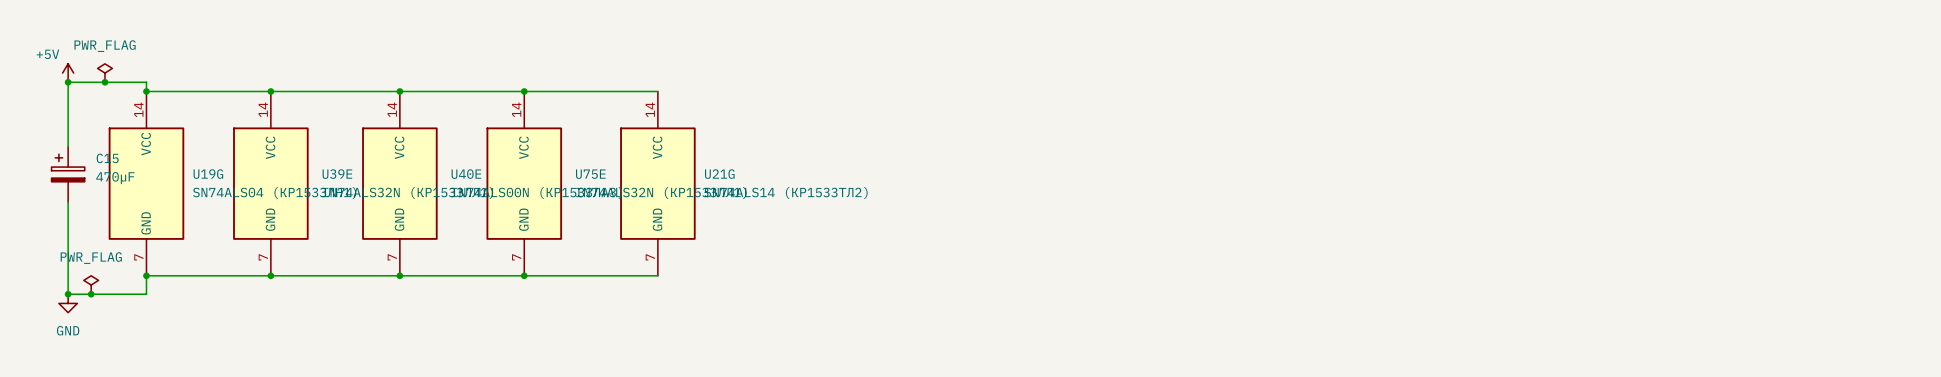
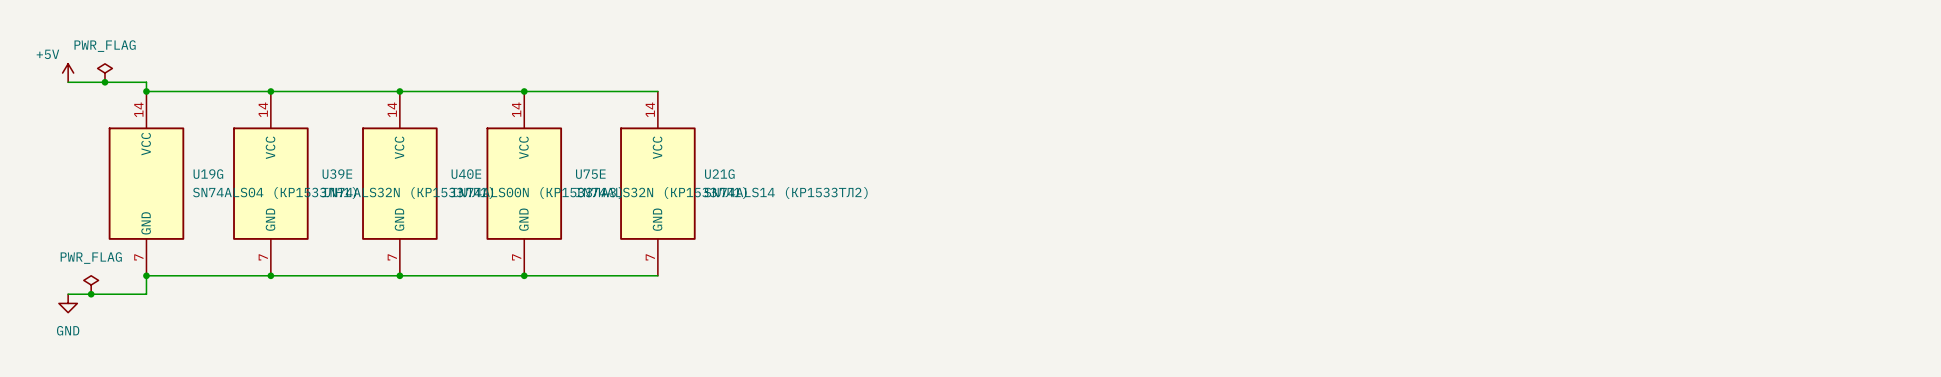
wire: (68, 82) (68, 146) -> none
junction: (68, 82) -> none
C15: 470µF (68, 174) -> none
wire: (68, 202) (68, 294) -> none
junction: (68, 294) -> none

